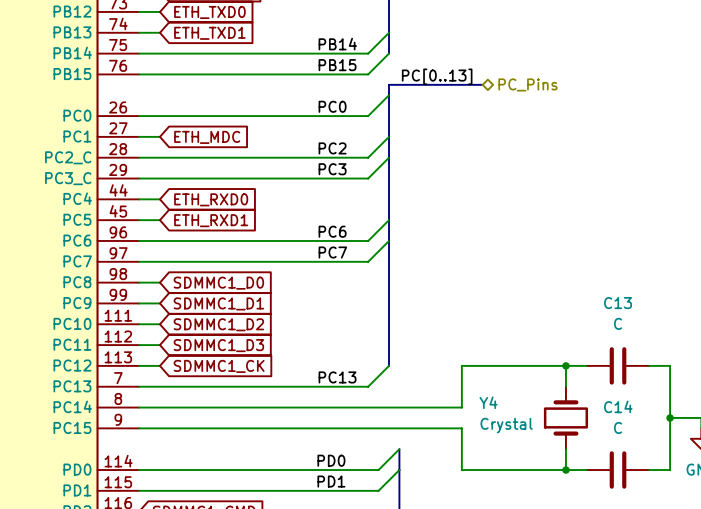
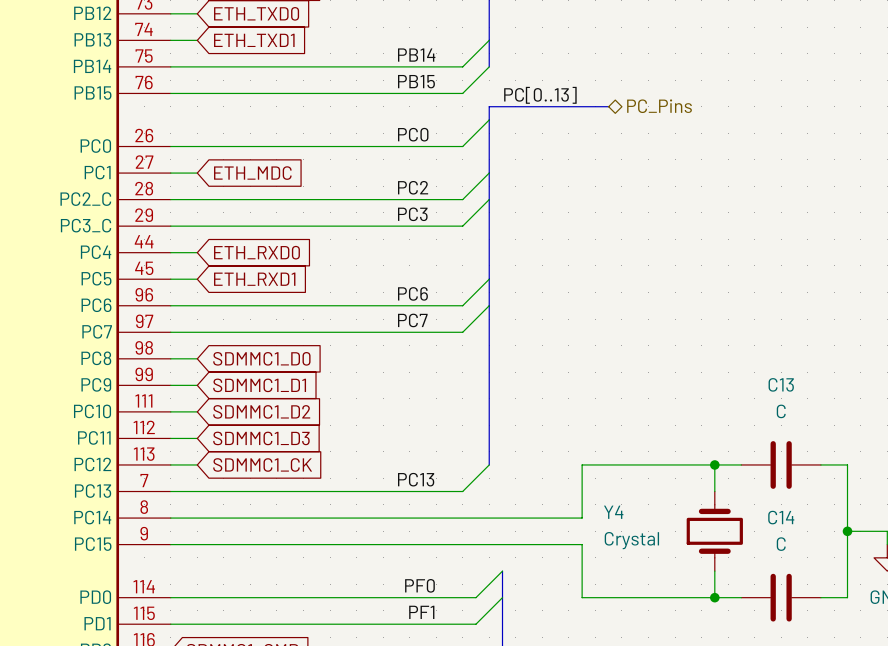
label: PD0 (331, 460) -> PF0 (419, 585)
label: PD1 (331, 481) -> PF1 (421, 612)

